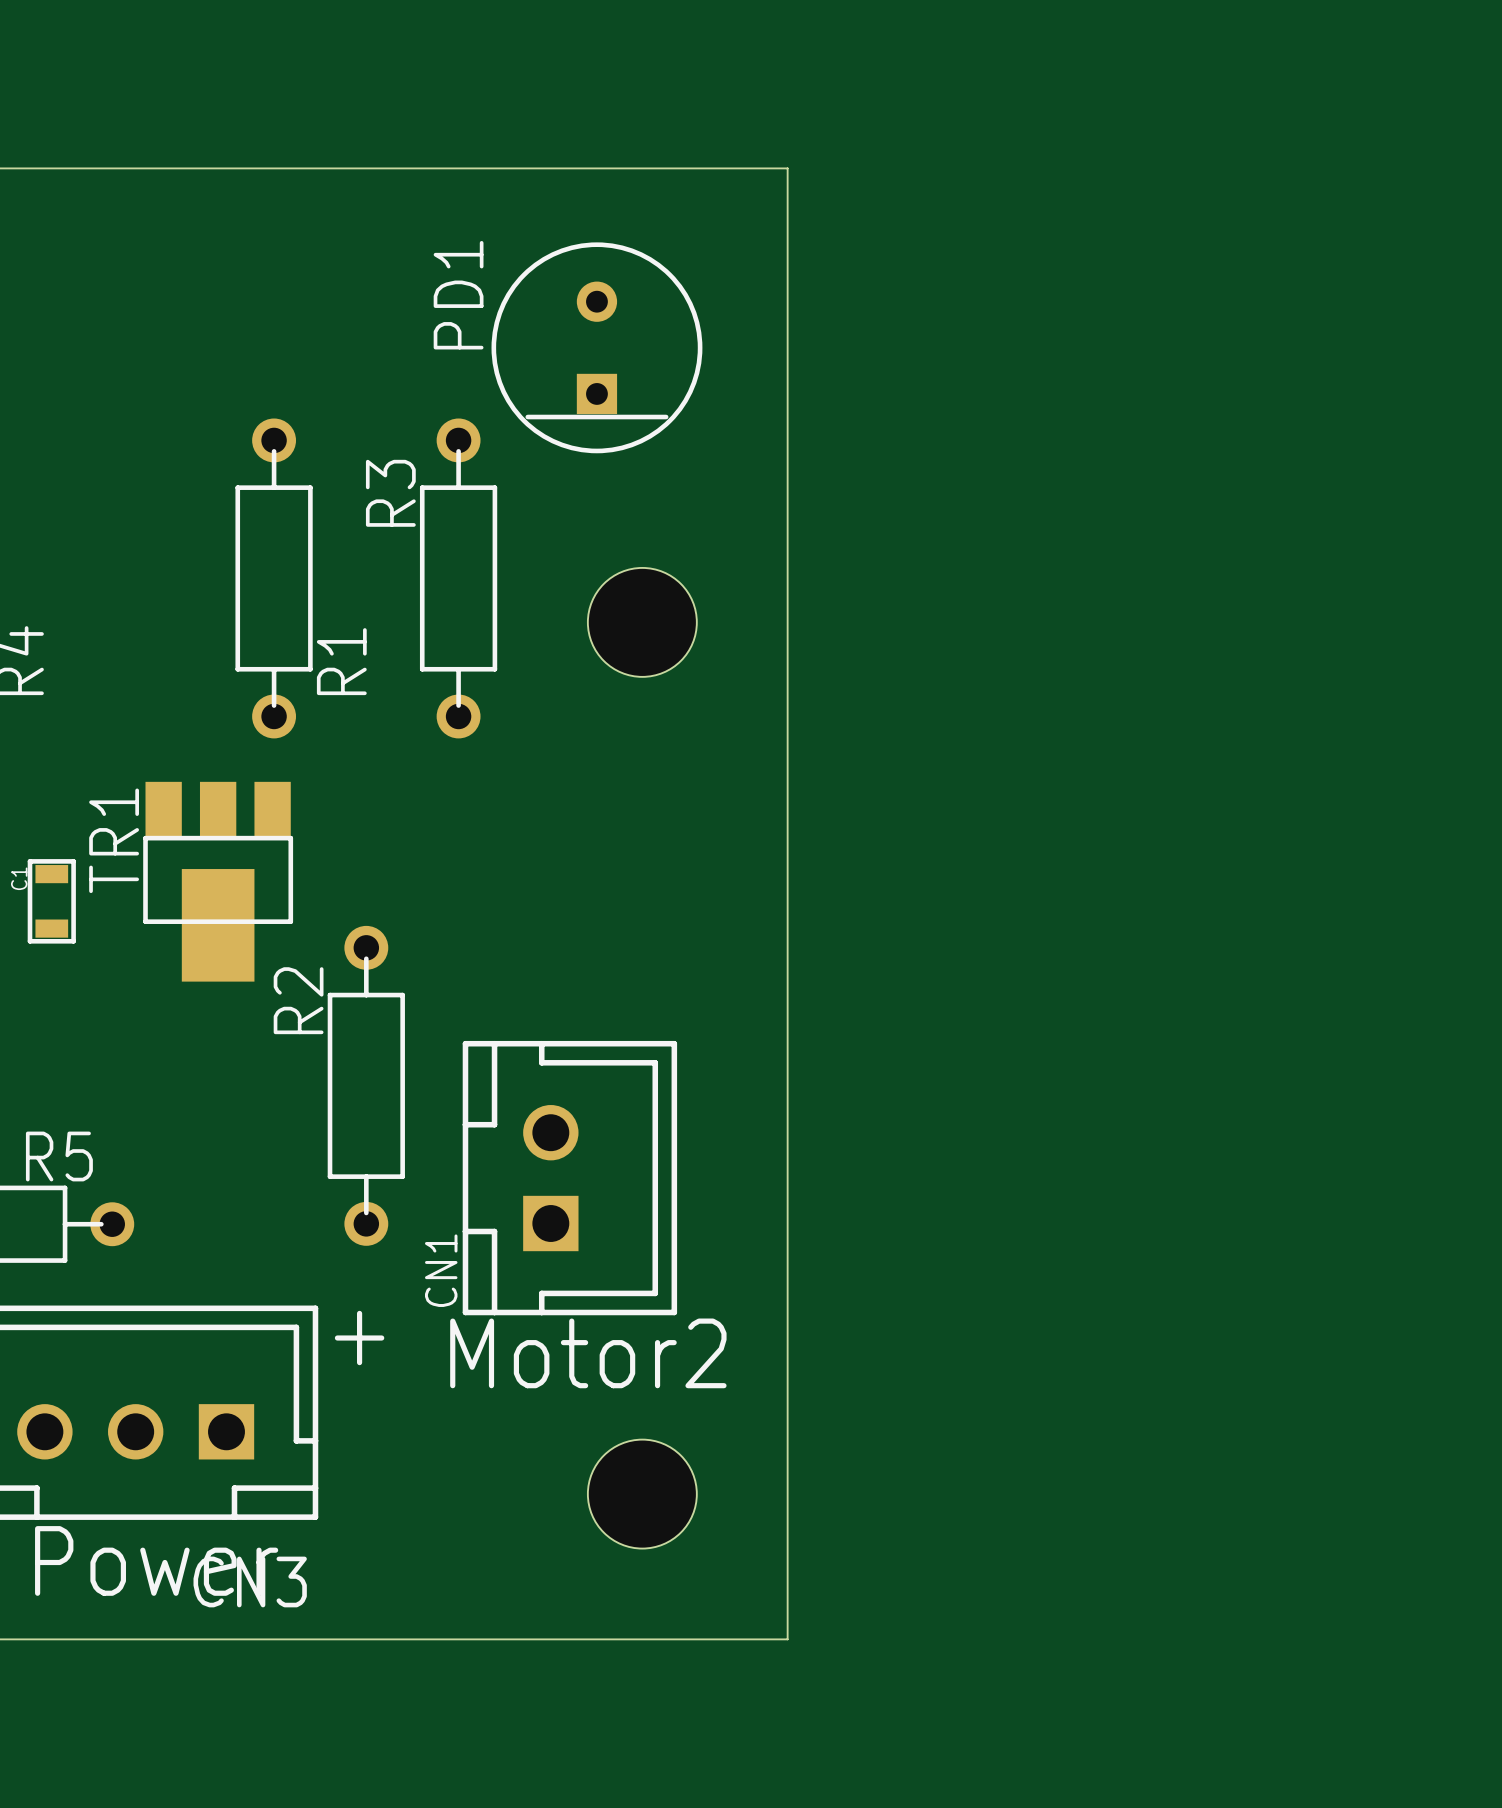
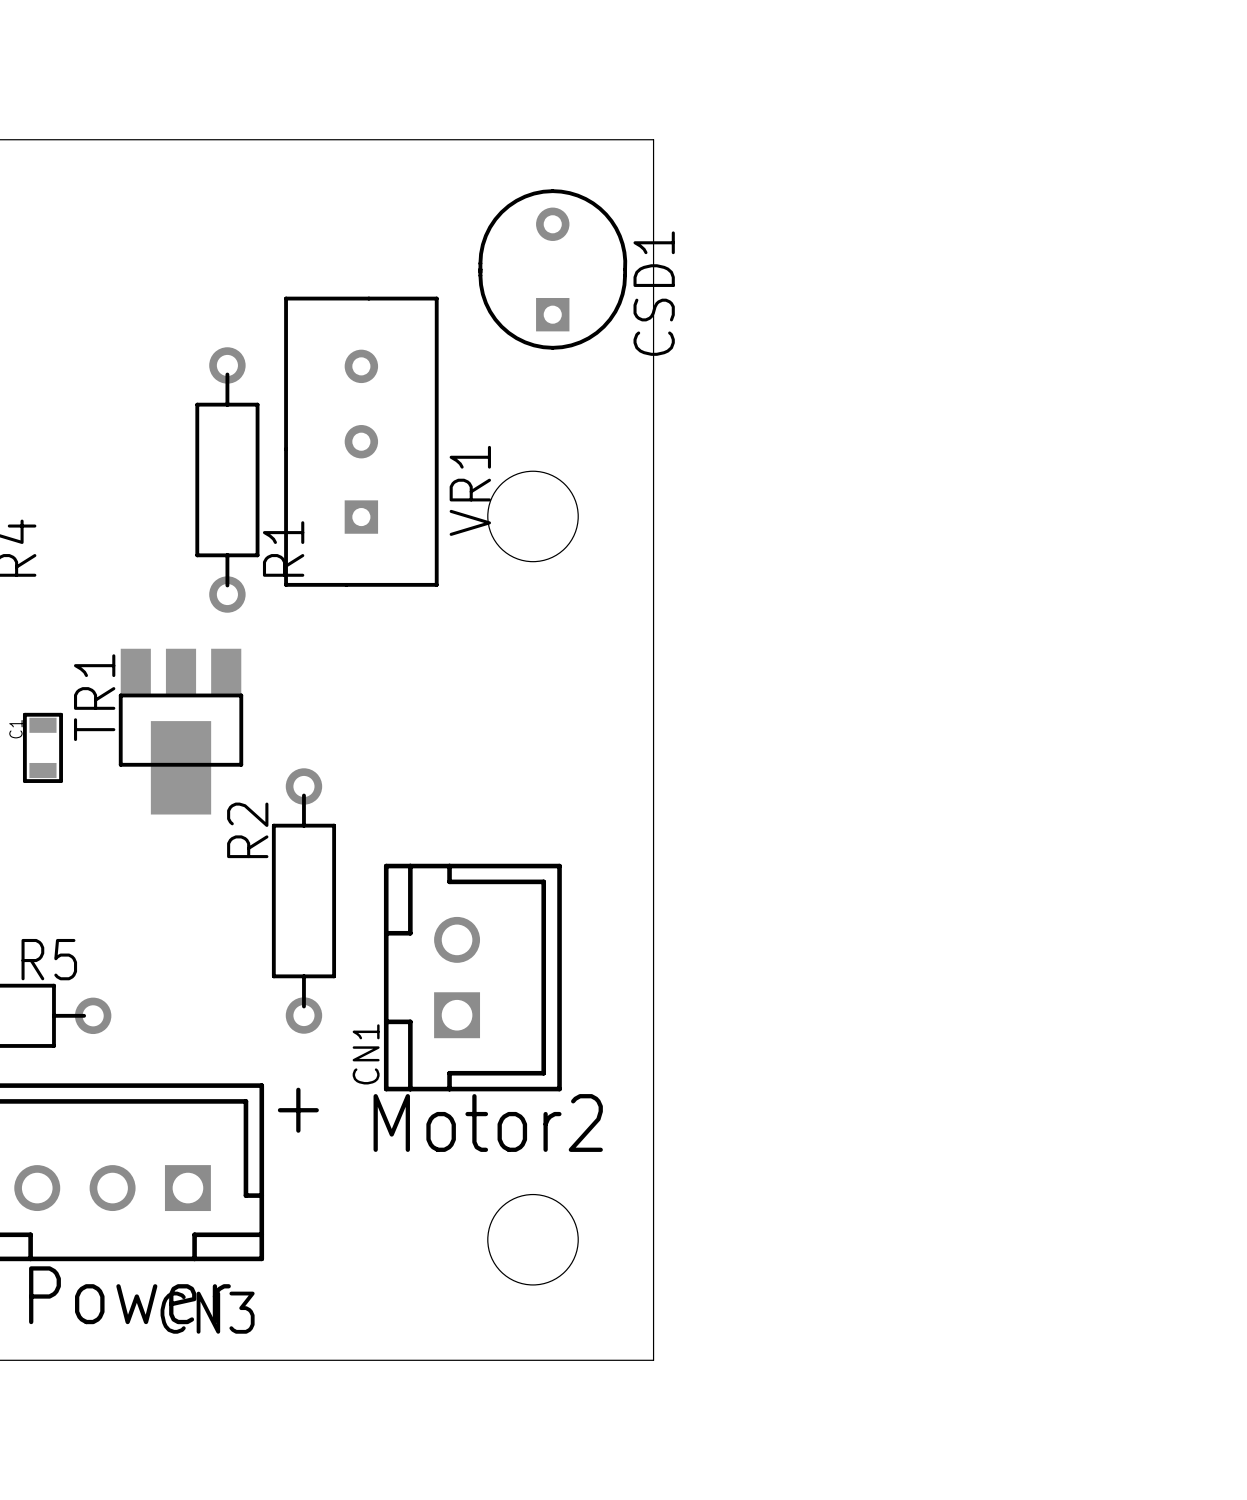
CSD1: none -> (552, 269)
PD1: (596, 347) -> none
VR1: none -> (361, 441)
R3: (458, 578) -> none

